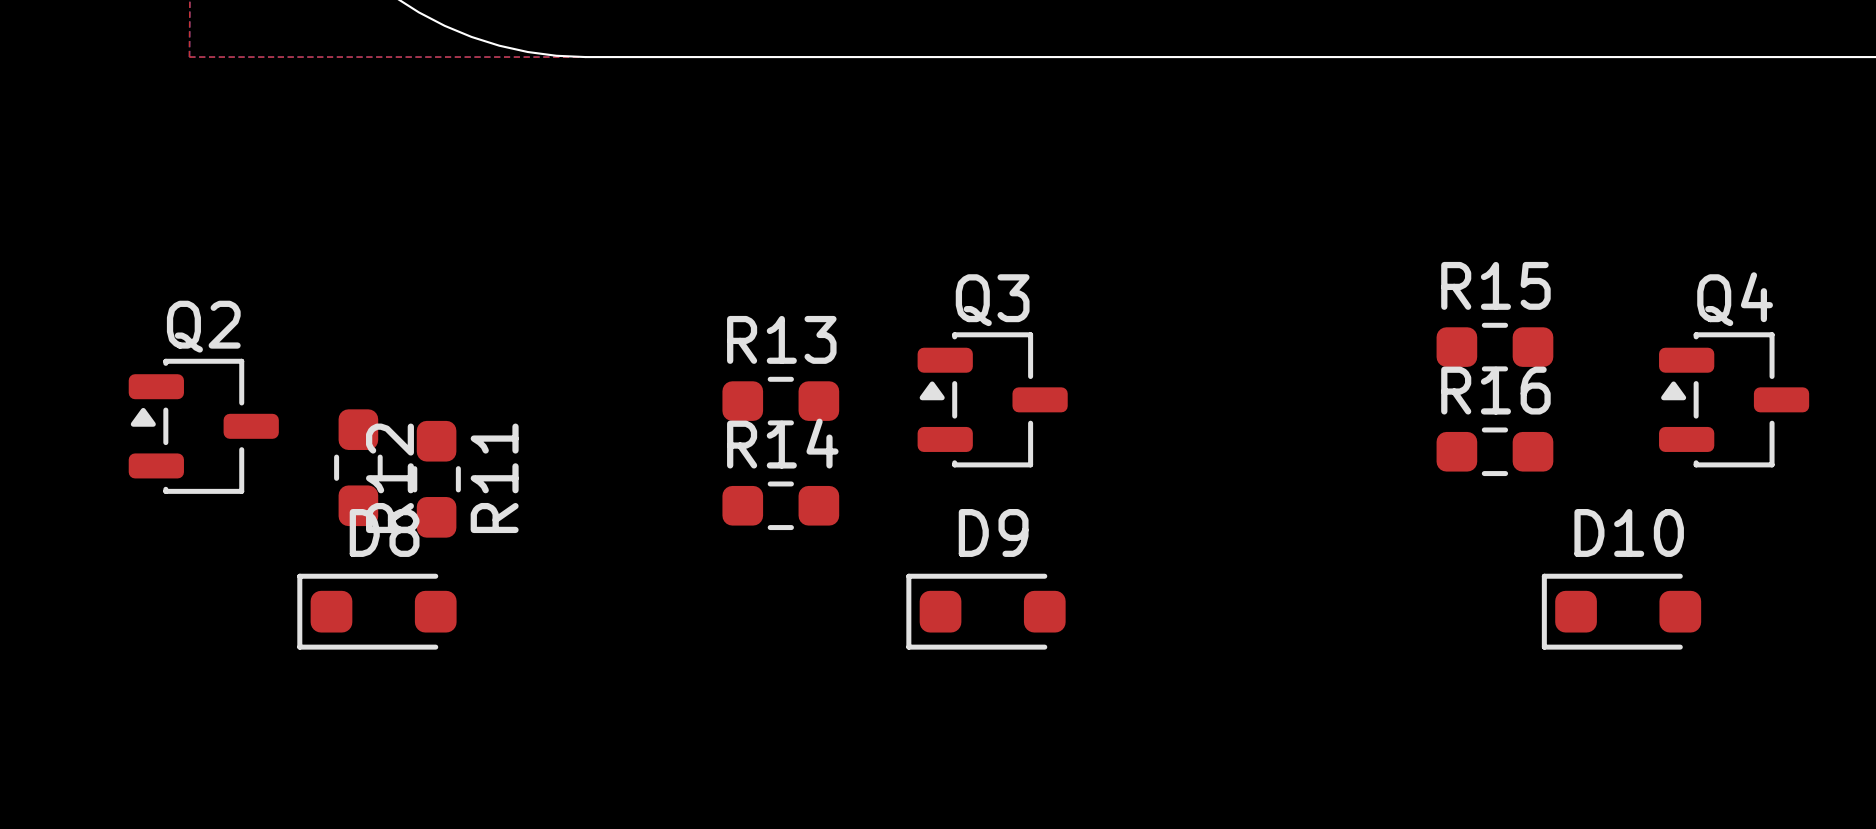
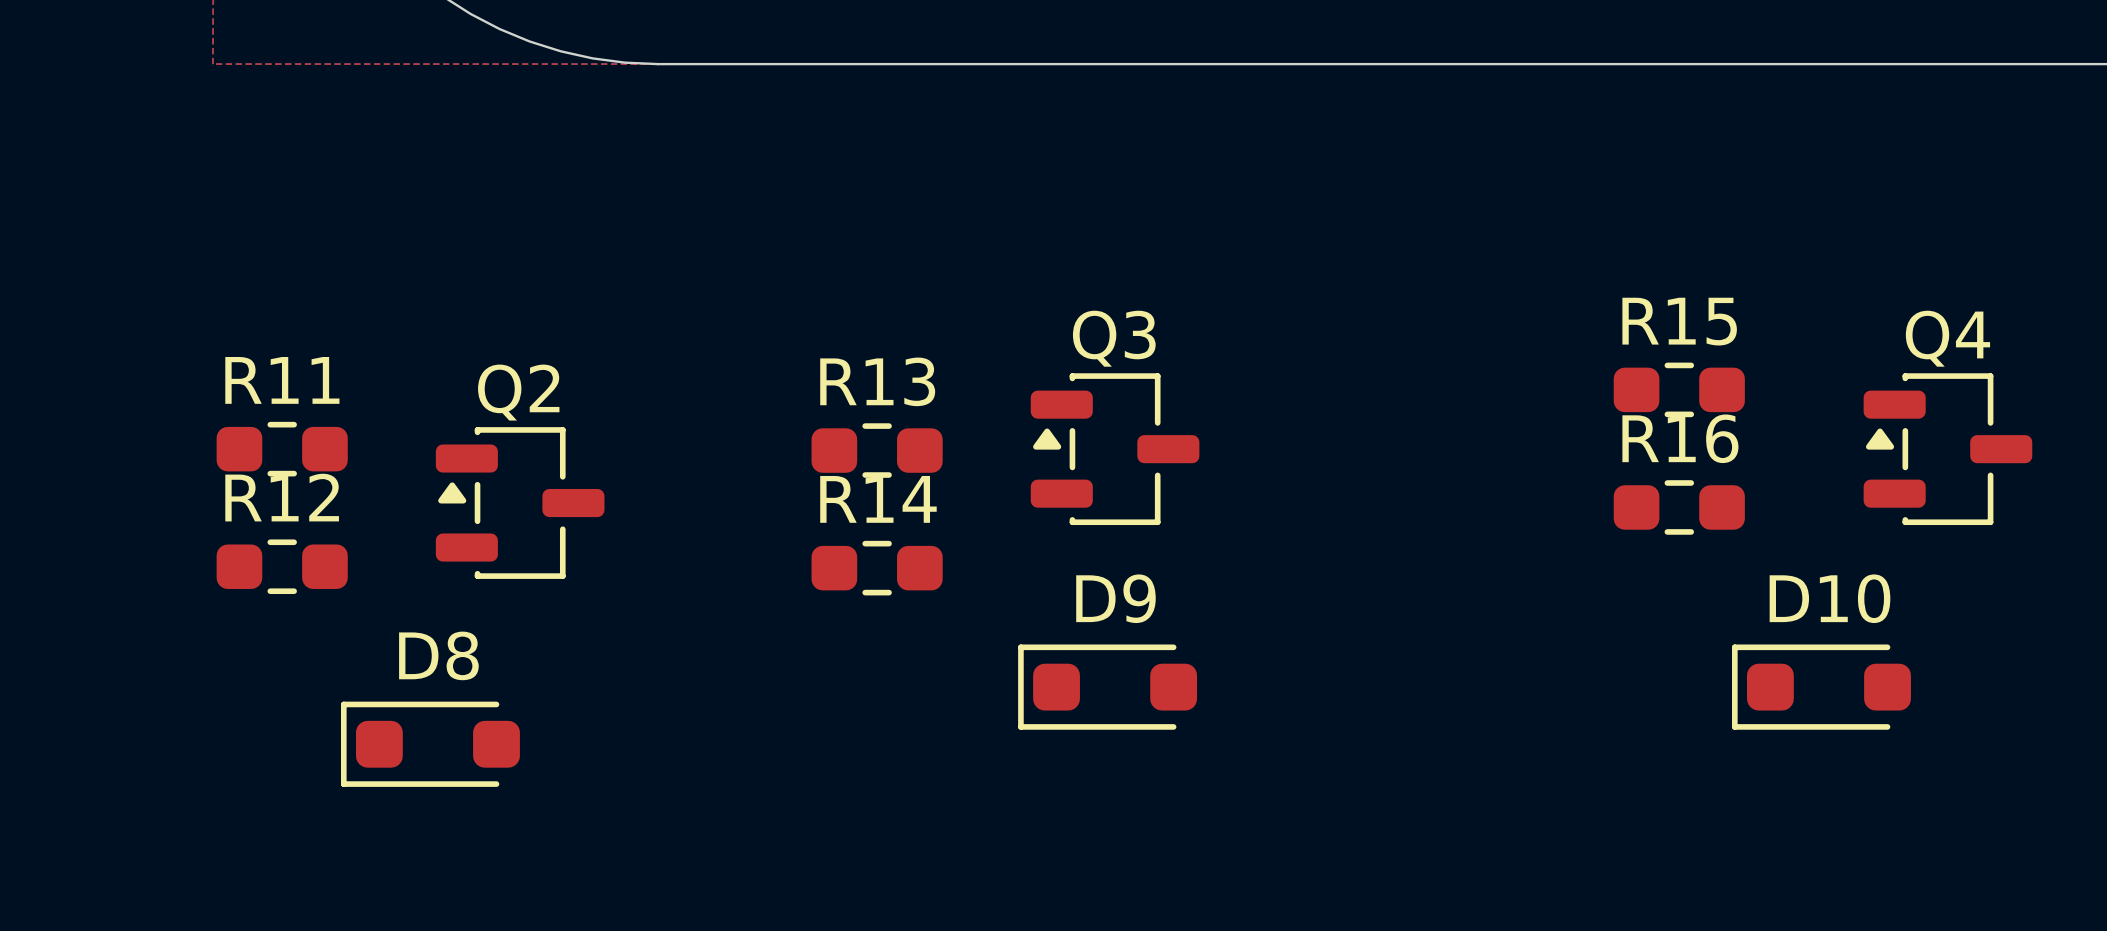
Q2 position: (203, 426) -> (520, 503)
R12 rotation: 0° (358, 467) -> 90° clockwise (282, 566)
R12 position: (358, 467) -> (282, 566)
R11 name position: R11 (494, 478) -> R11 (282, 380)
R11 rotation: 0° (436, 479) -> 90° clockwise (282, 449)
R11 position: (436, 479) -> (282, 449)
D8 position: (376, 611) -> (430, 744)

